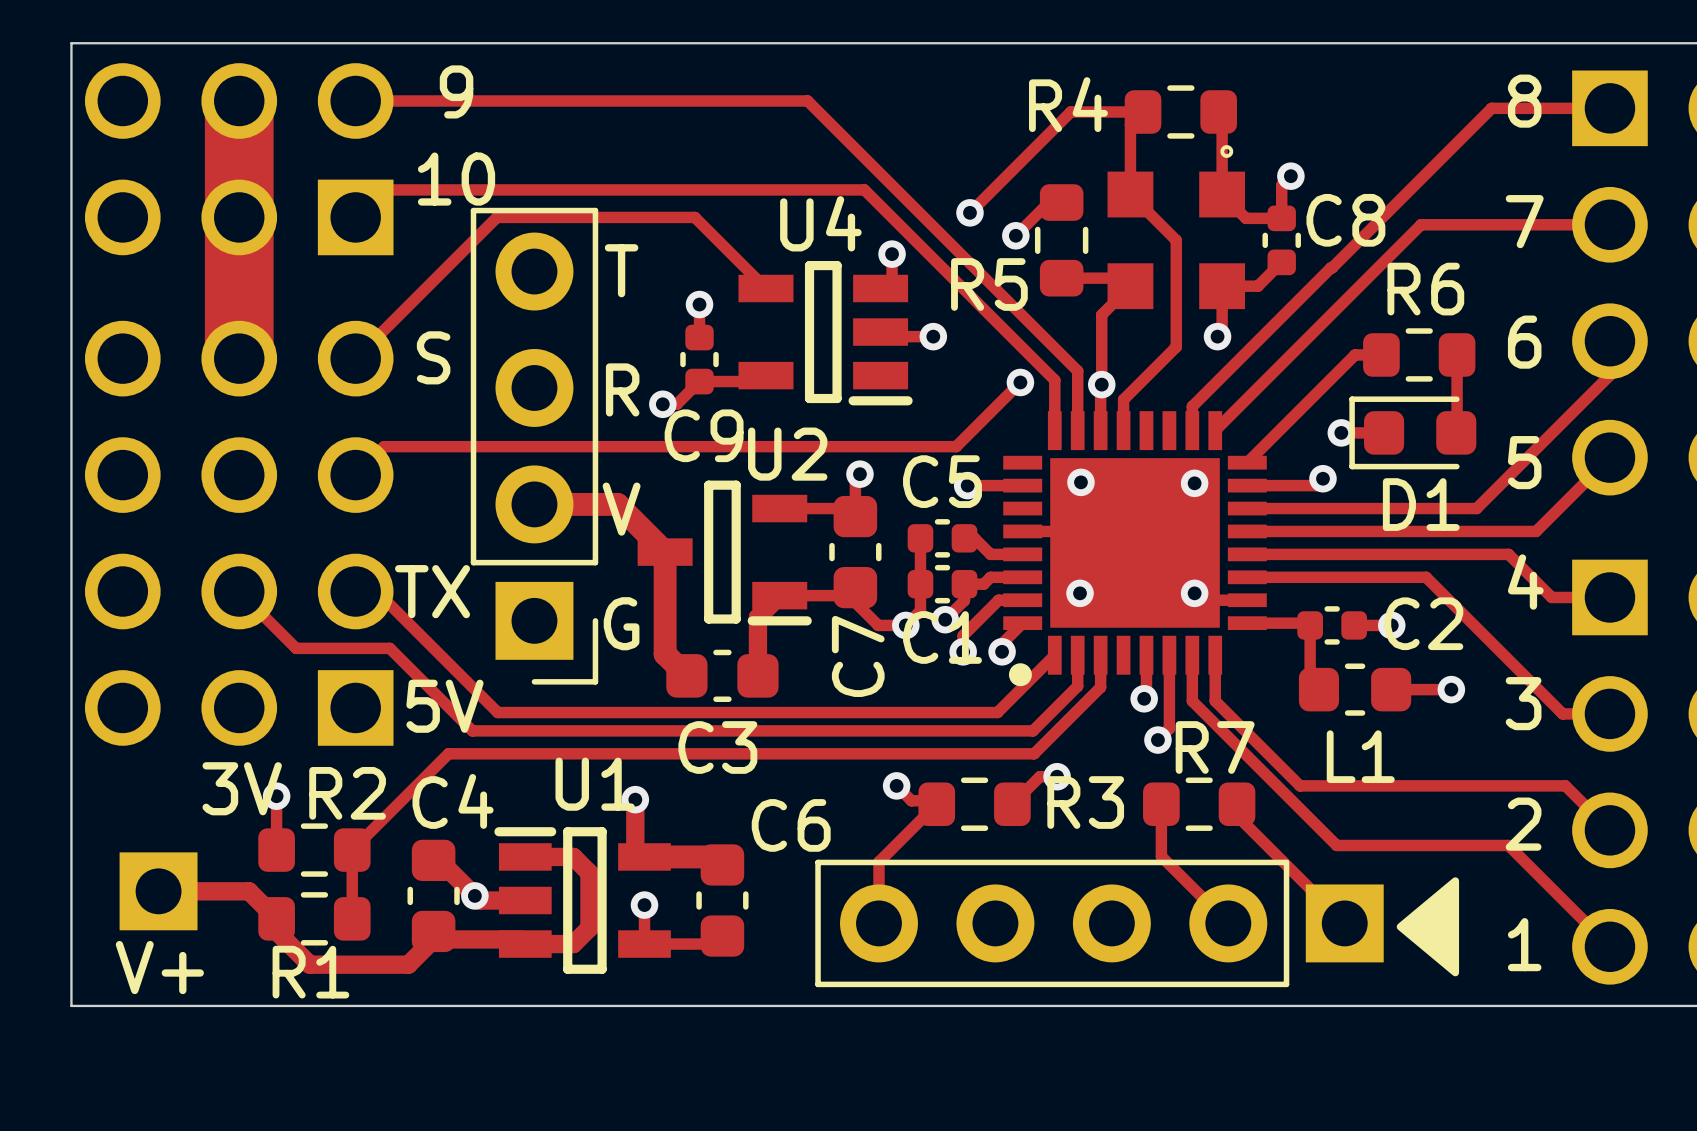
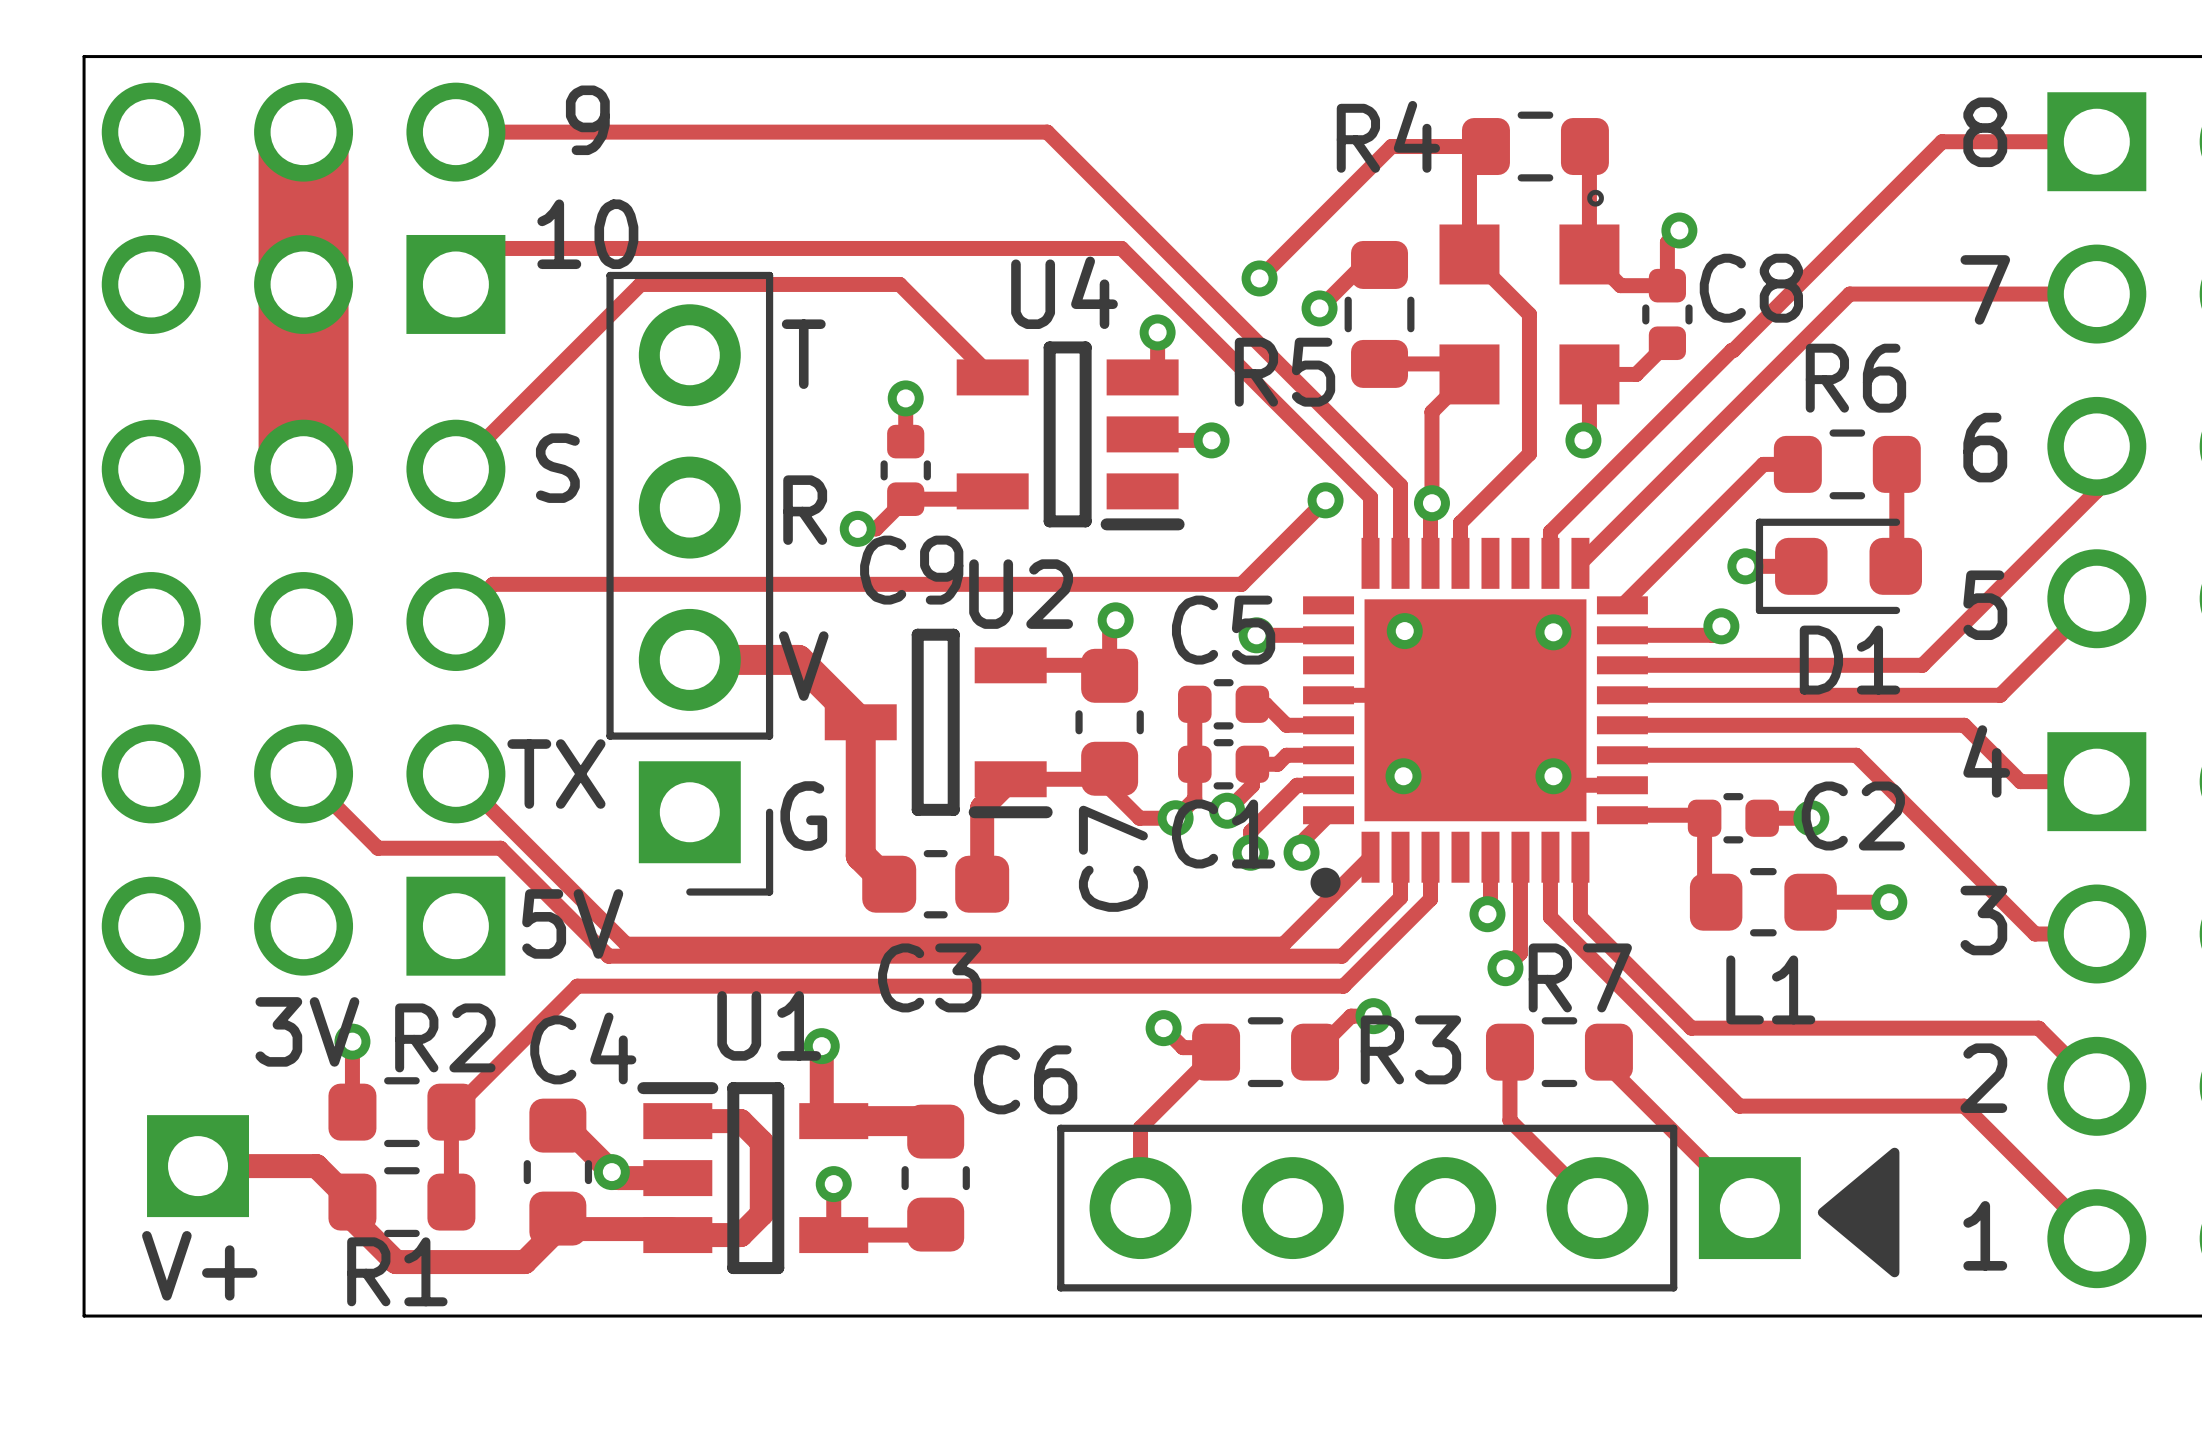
track: (355, 591) (376, 591) (497, 712) (997, 712) -> (455, 773) (626, 944) (1283, 944) (1295, 932)

